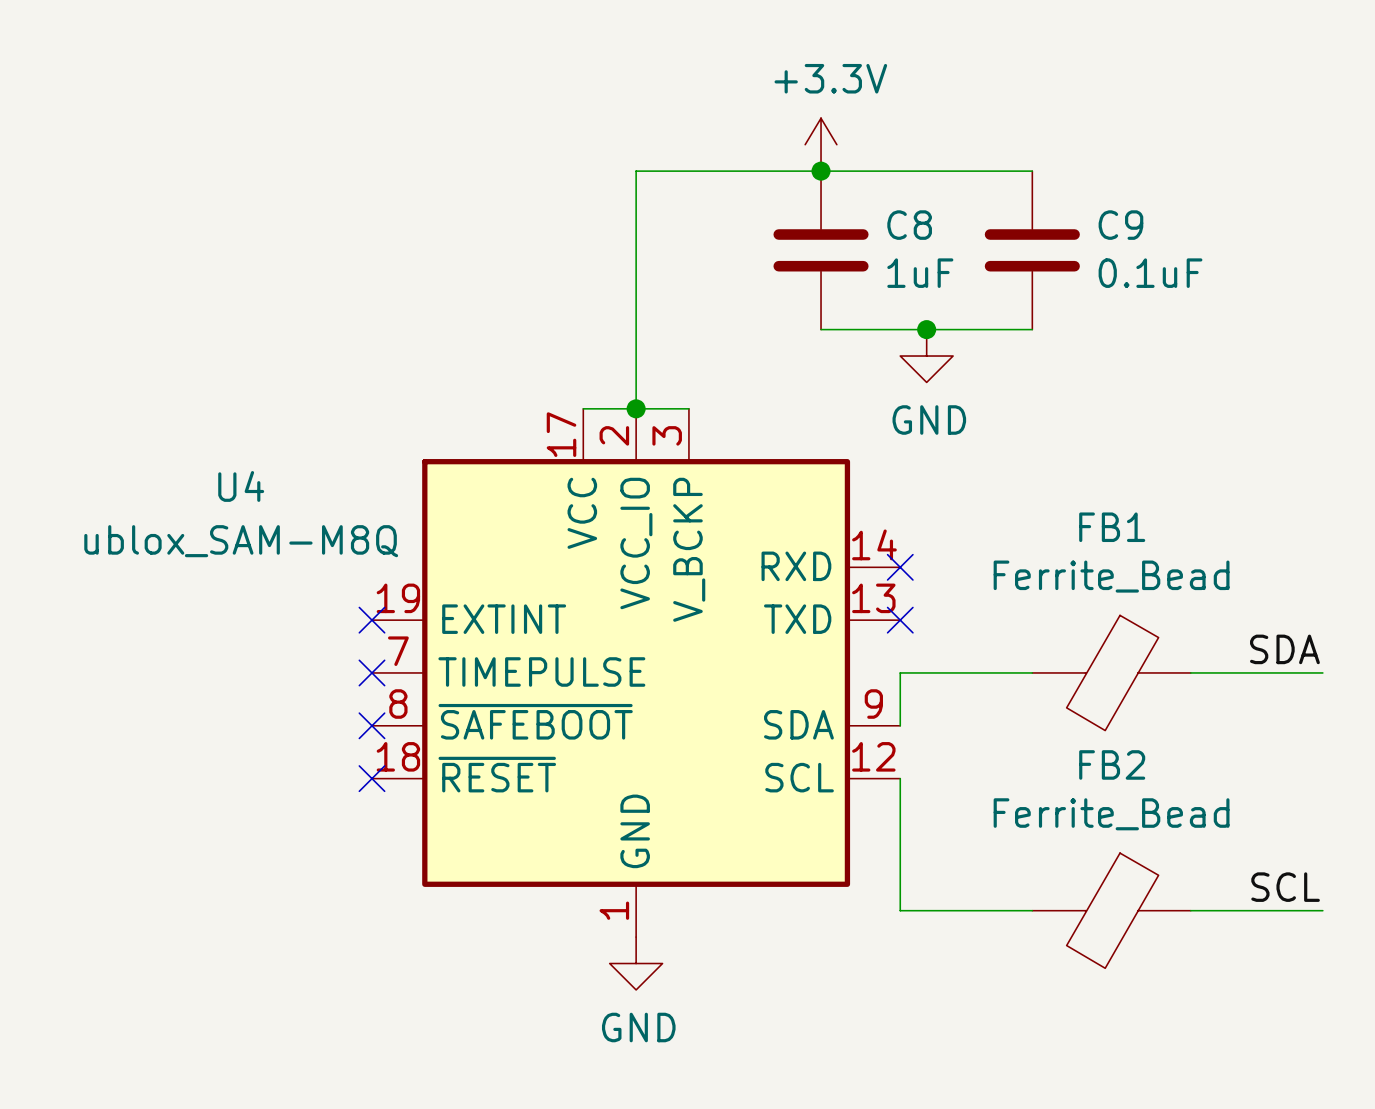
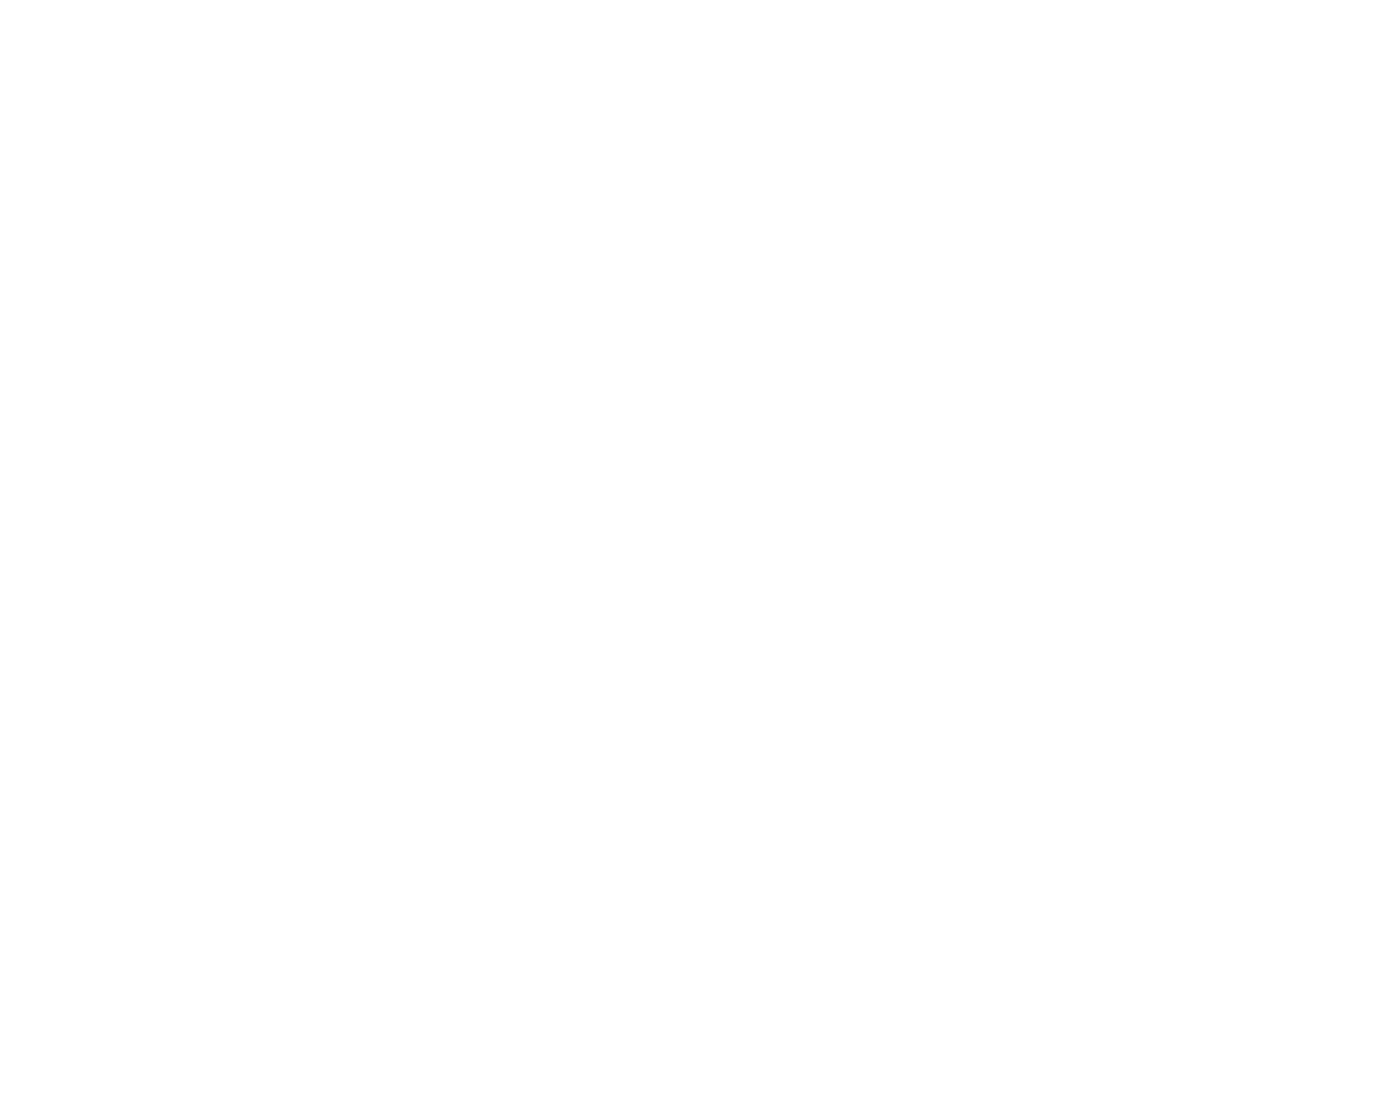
power symbol: +3.3V (821, 144) -> none
junction: (821, 171) -> none
wire: (1032, 171) (636, 171) (636, 408) -> none
C8: 1uF (821, 250) -> none
C9: 0.1uF (1032, 250) -> none
wire: (821, 329) (1032, 329) -> none
junction: (926, 329) -> none
power symbol: GND (926, 356) -> none
wire: (583, 408) (688, 408) -> none
junction: (636, 408) -> none
no-connect mark: (900, 567) -> none
no-connect mark: (371, 620) -> none
no-connect mark: (900, 620) -> none
label: SDA (1284, 649) -> none
no-connect mark: (371, 672) -> none
U4: ublox_SAM-M8Q (636, 672) -> none
wire: (1032, 672) (900, 672) (900, 725) -> none
FB1: Ferrite_Bead (1111, 672) -> none
wire: (1190, 672) (1322, 672) -> none
no-connect mark: (371, 725) -> none
no-connect mark: (371, 778) -> none
wire: (900, 778) (900, 910) (1032, 910) -> none
label: SCL (1285, 887) -> none
FB2: Ferrite_Bead (1111, 910) -> none
wire: (1190, 910) (1322, 910) -> none
power symbol: GND (636, 963) -> none

